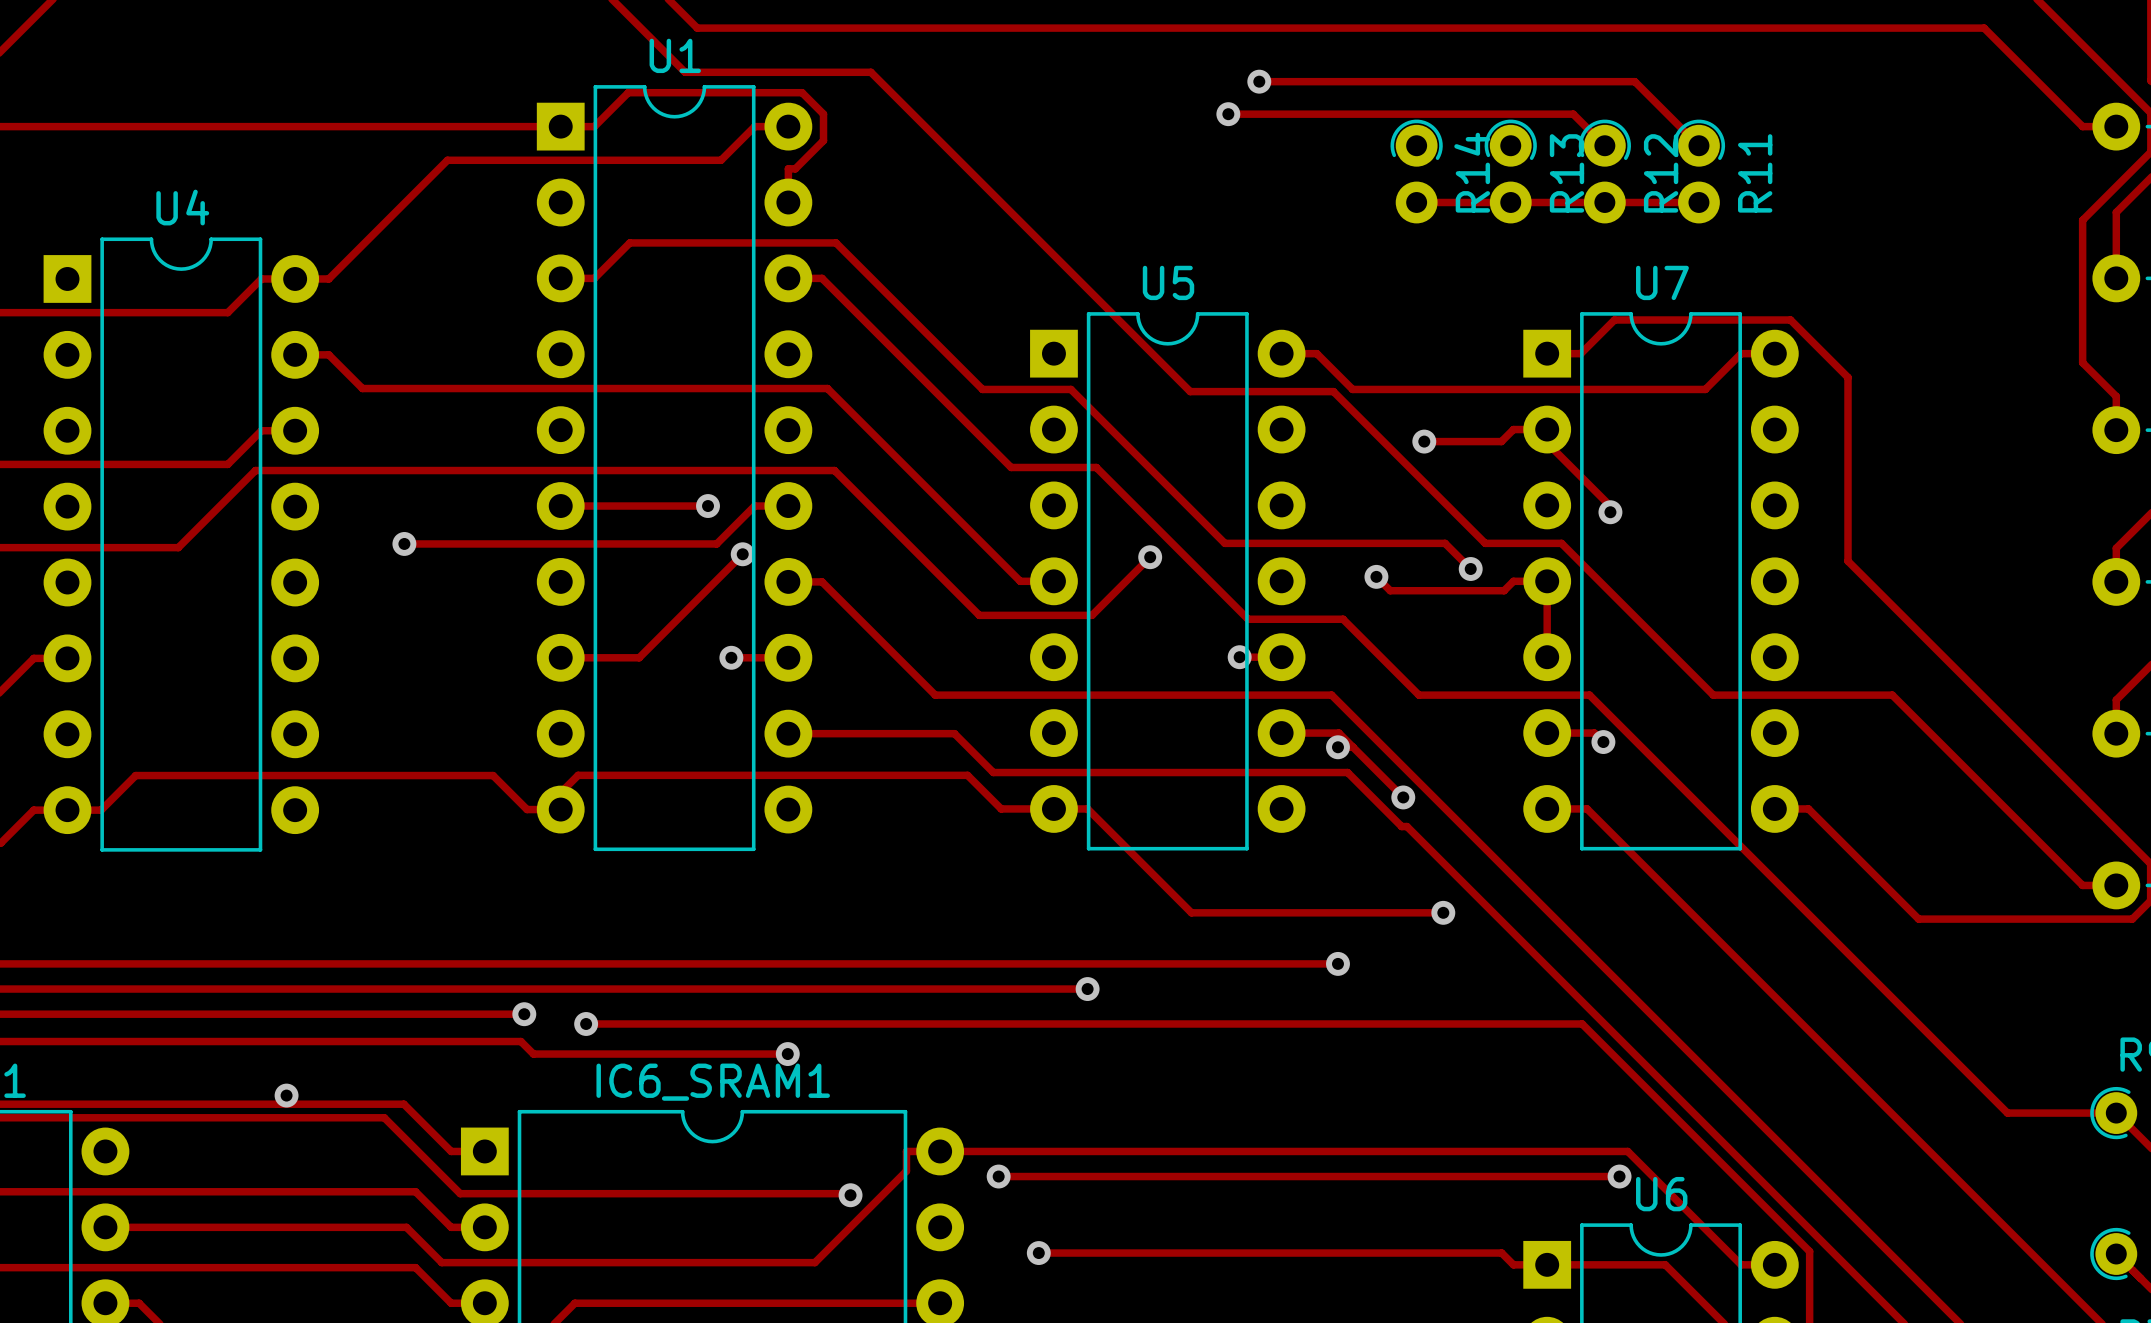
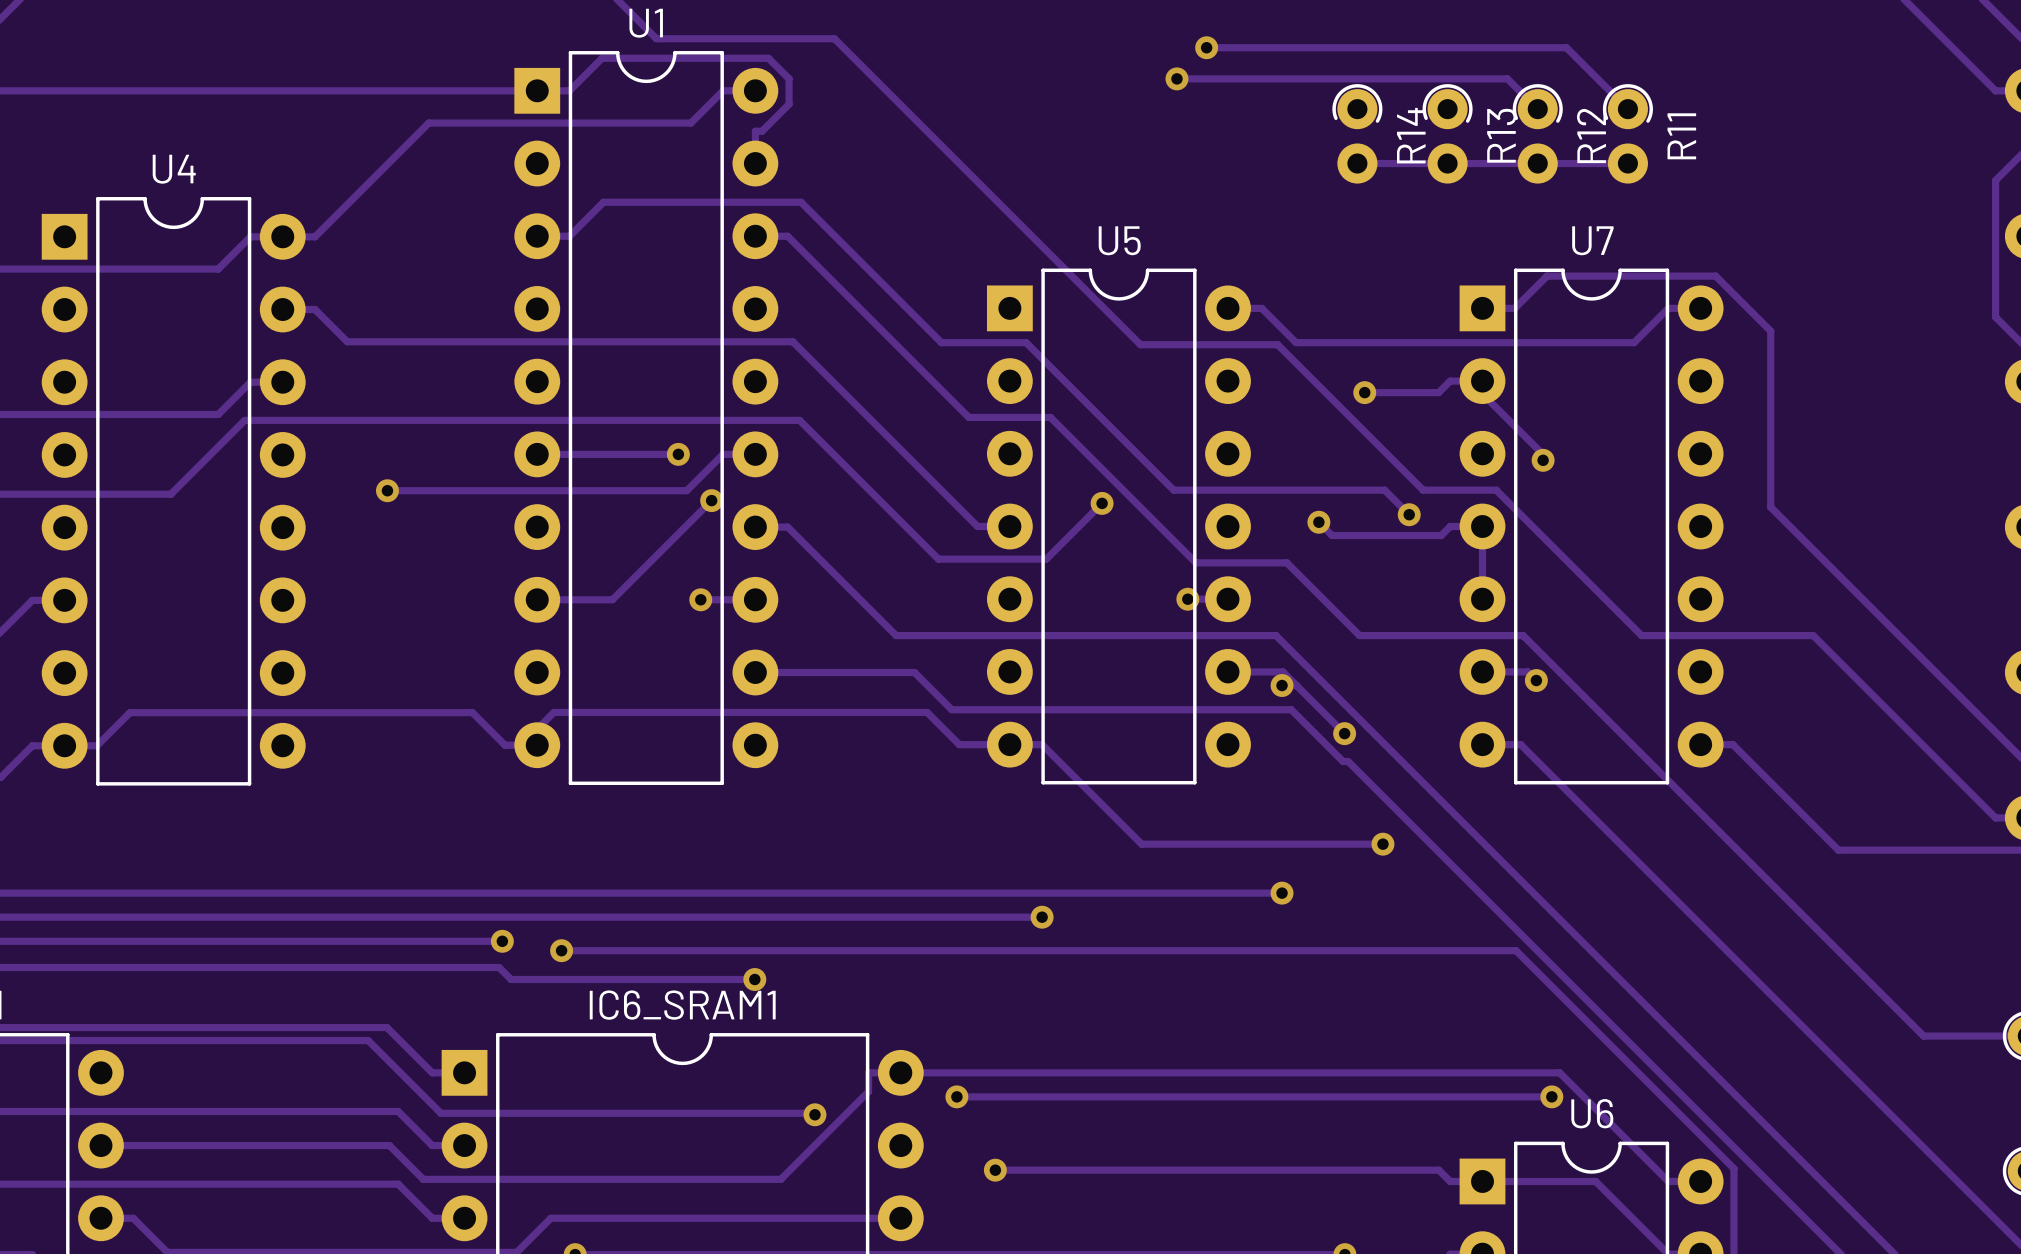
via: (286, 1095) -> none

